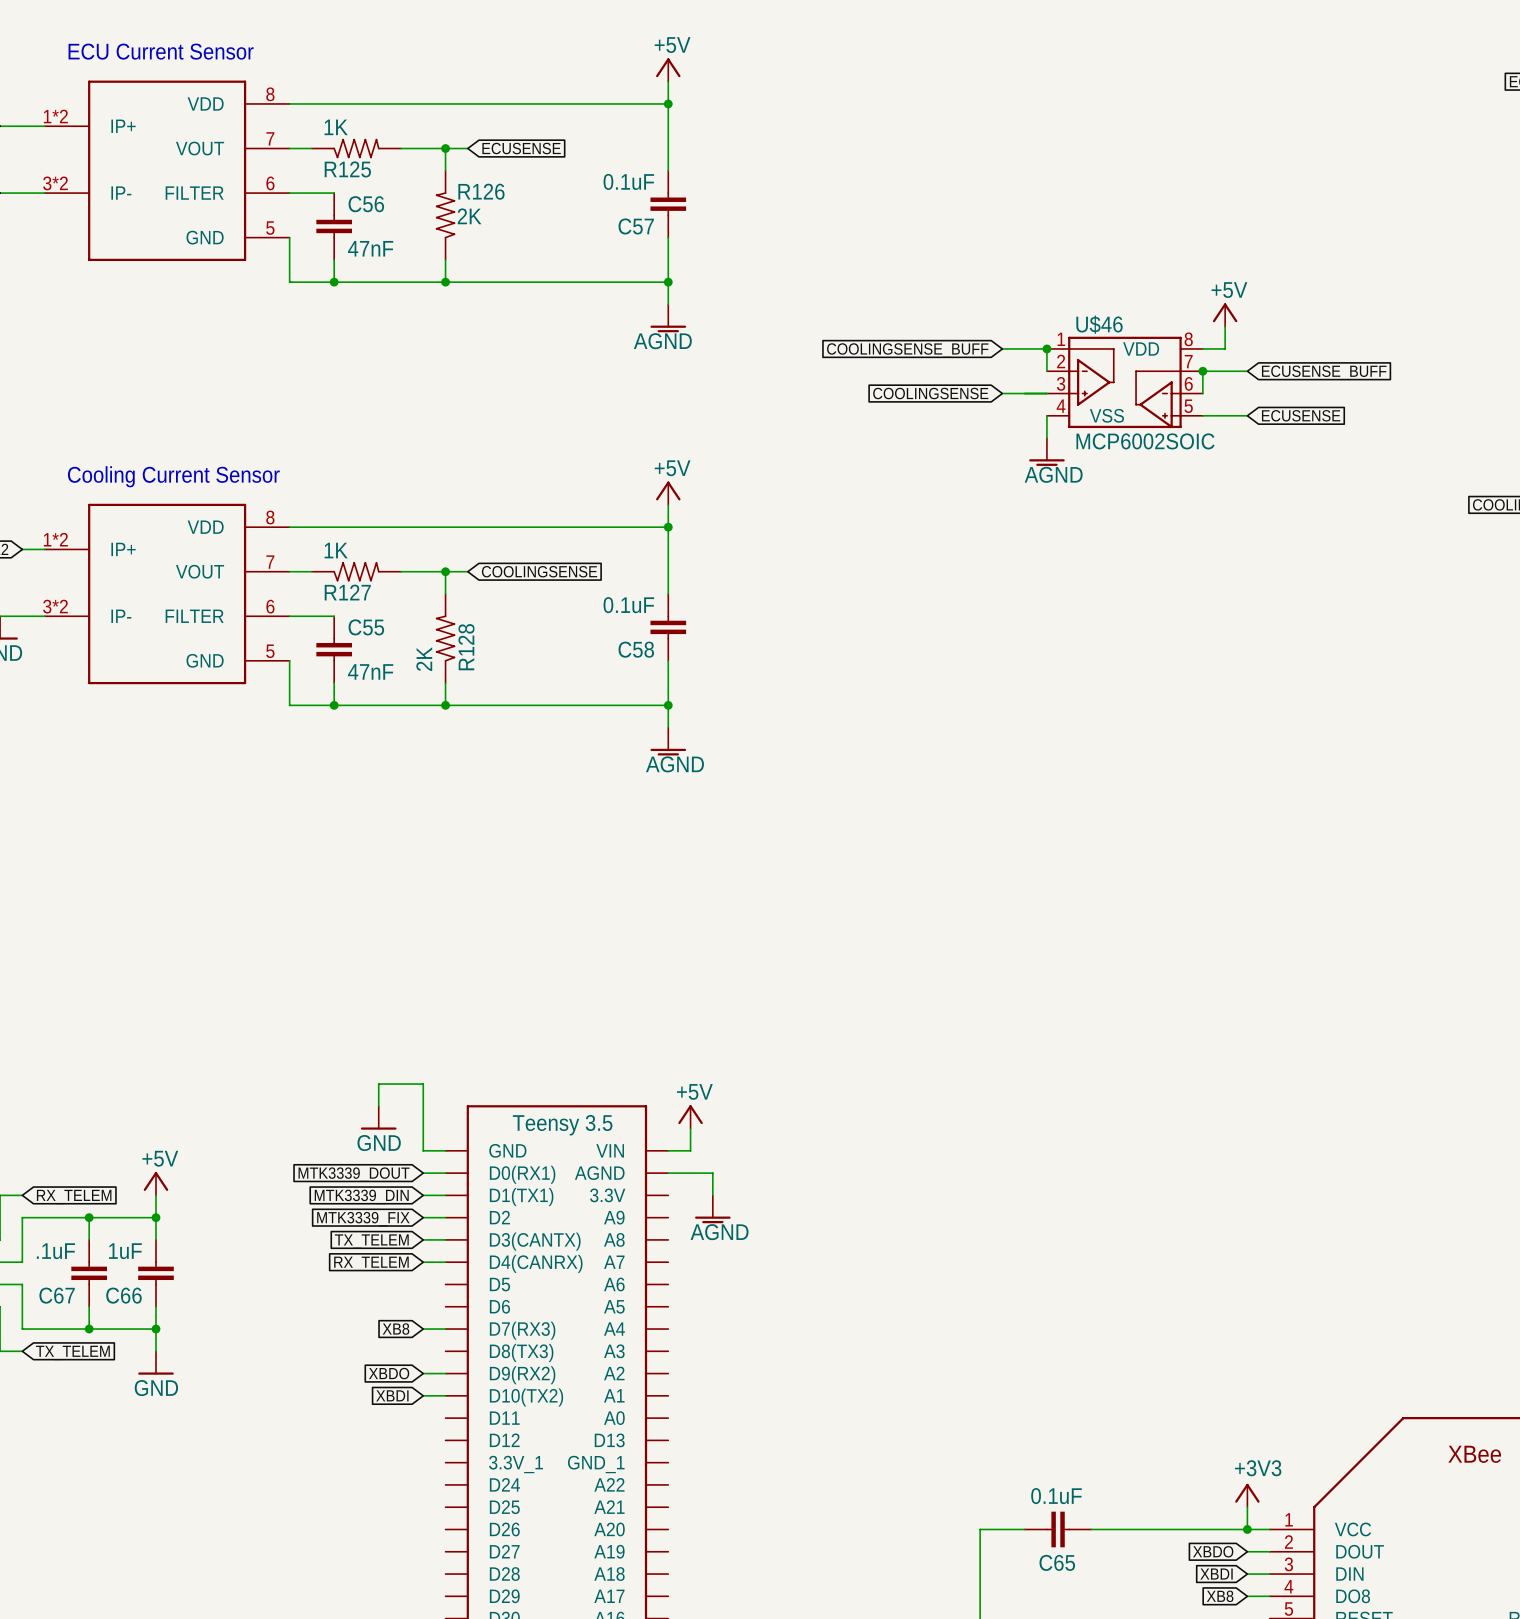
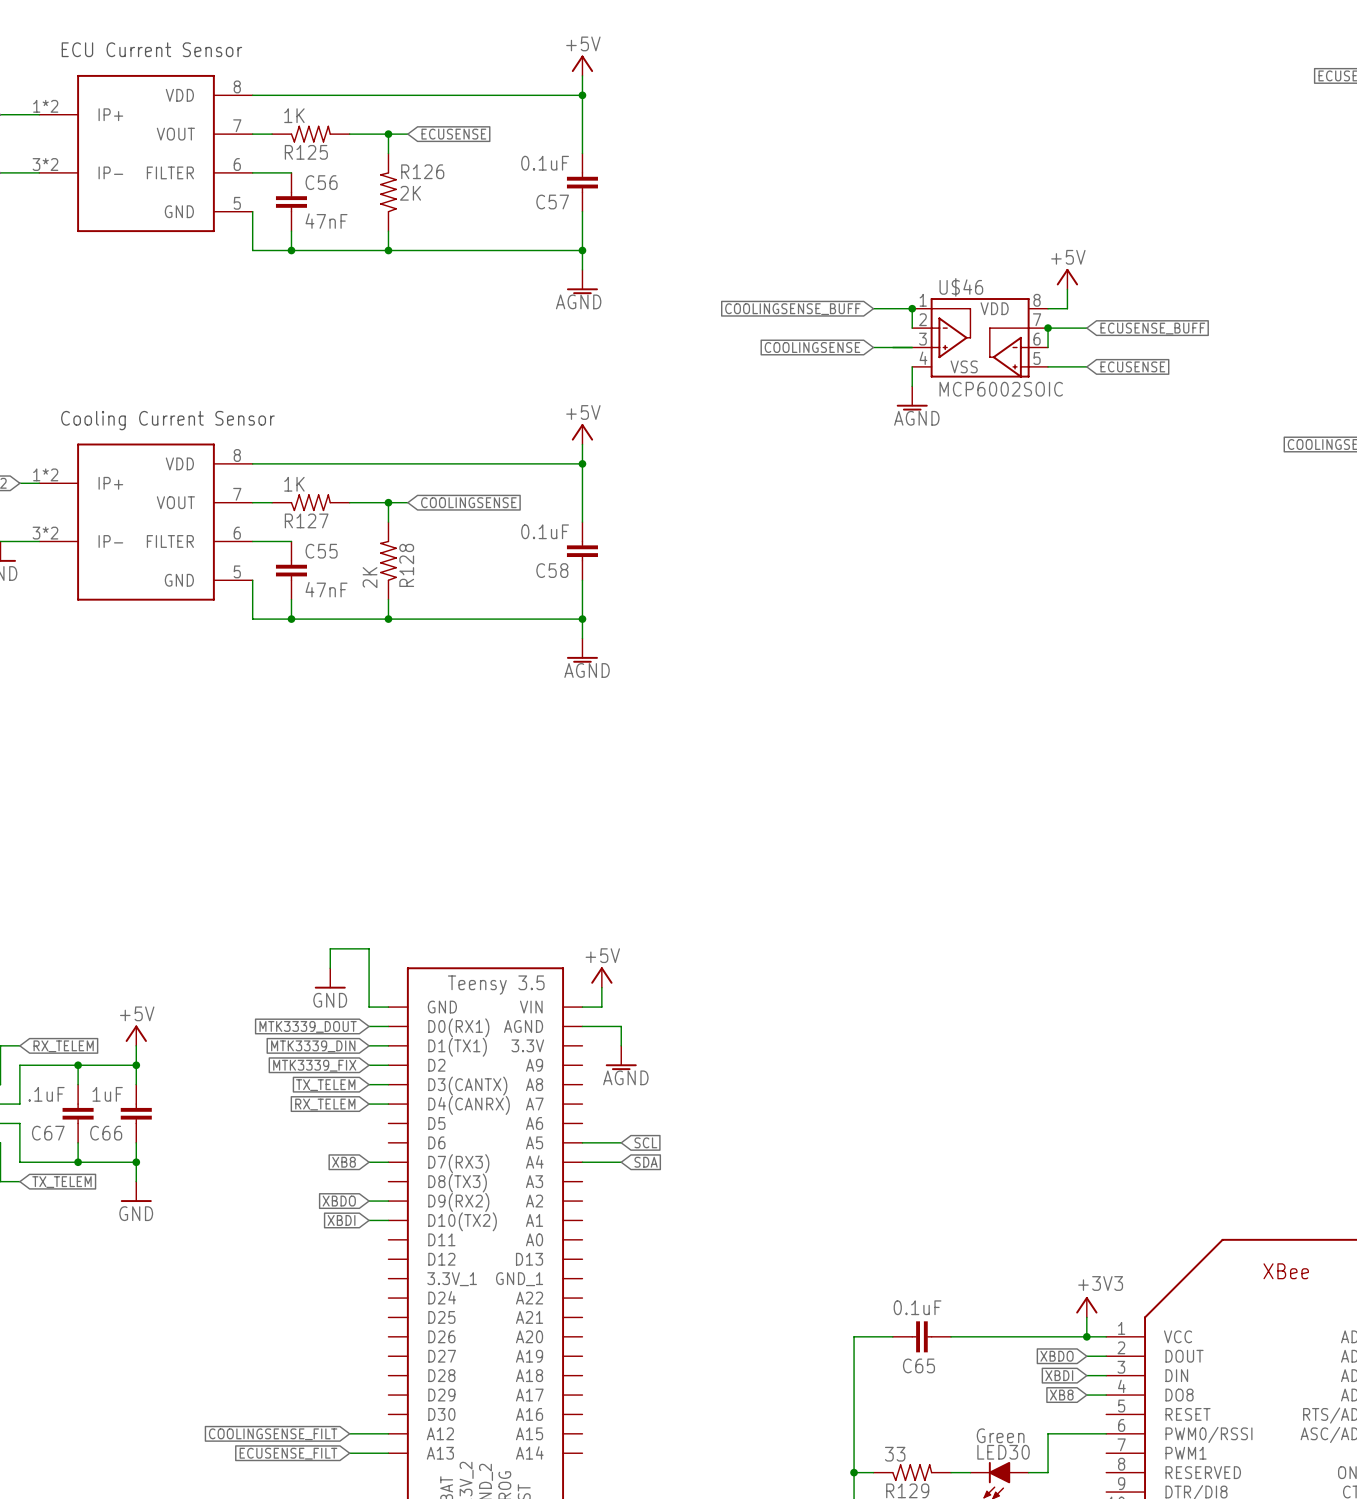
wire: none -> (582, 1142) (621, 1142)
global label: none -> SCL (645, 1142)
wire: none -> (582, 1162) (621, 1162)
global label: none -> SDA (646, 1162)

